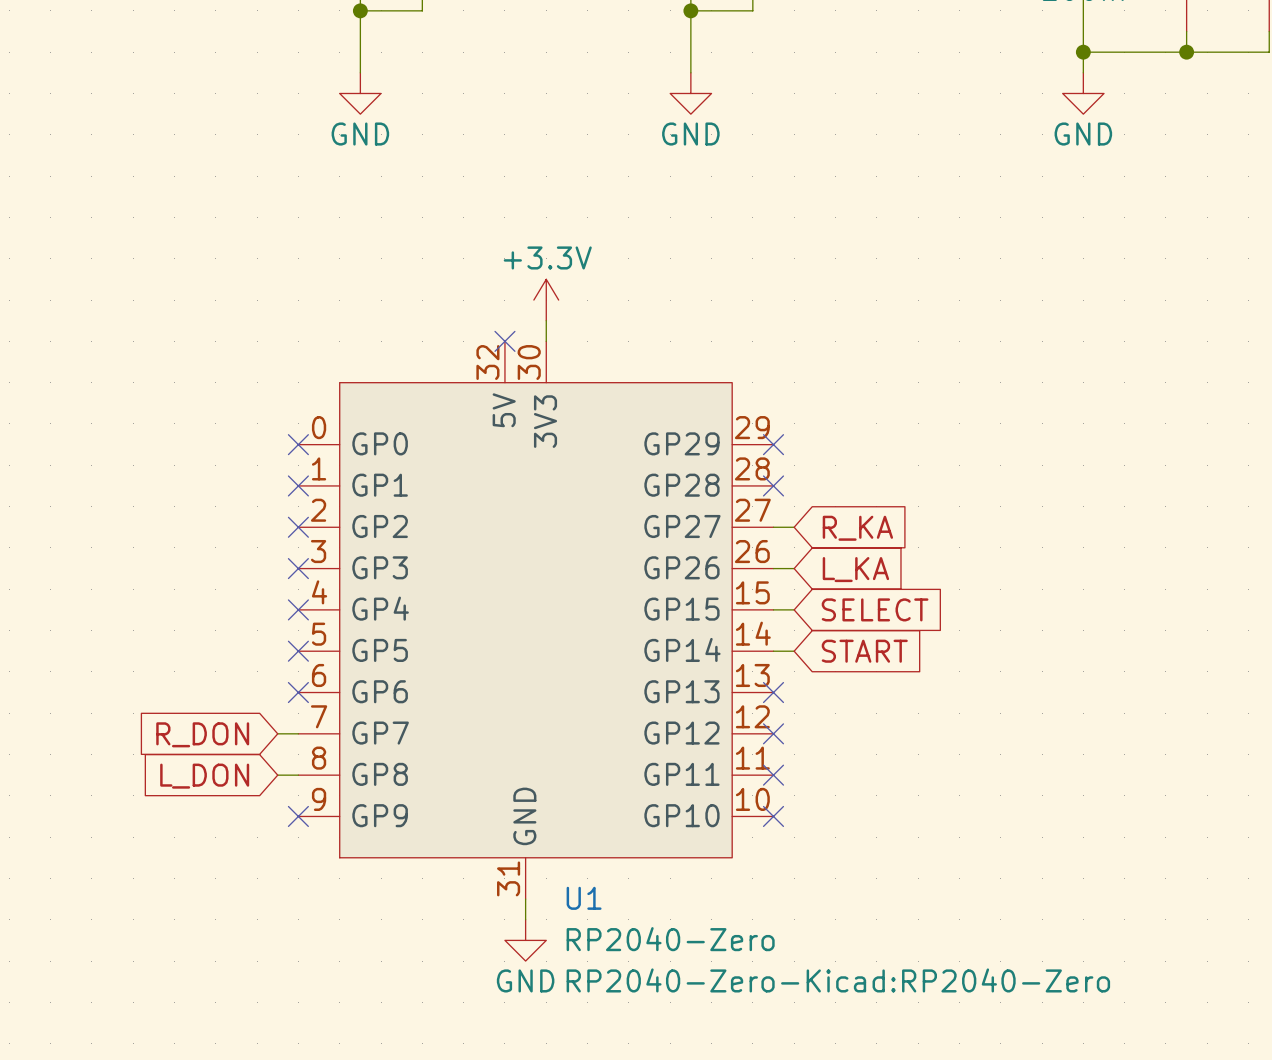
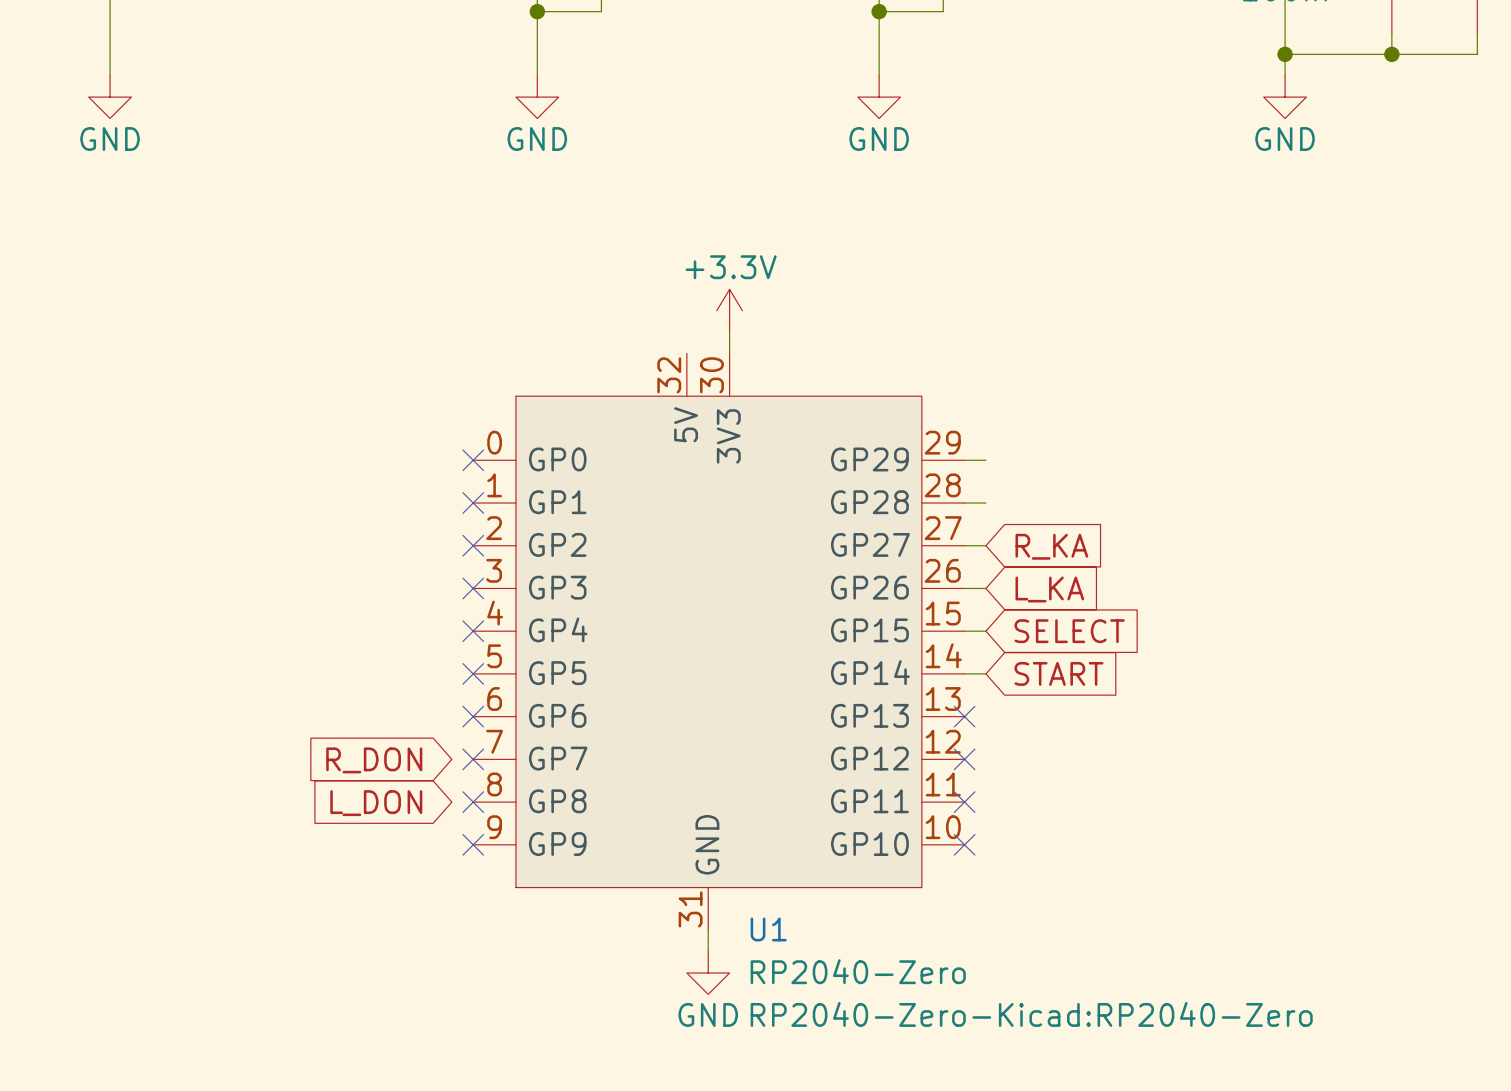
no-connect mark: (504, 341) -> none
wire: none -> (964, 460) (985, 460)
no-connect mark: (773, 444) -> none
wire: none -> (964, 503) (985, 503)
no-connect mark: (773, 485) -> none
wire: (277, 733) (298, 733) -> none
no-connect mark: none -> (473, 759)
wire: (277, 775) (298, 775) -> none
no-connect mark: none -> (473, 802)

